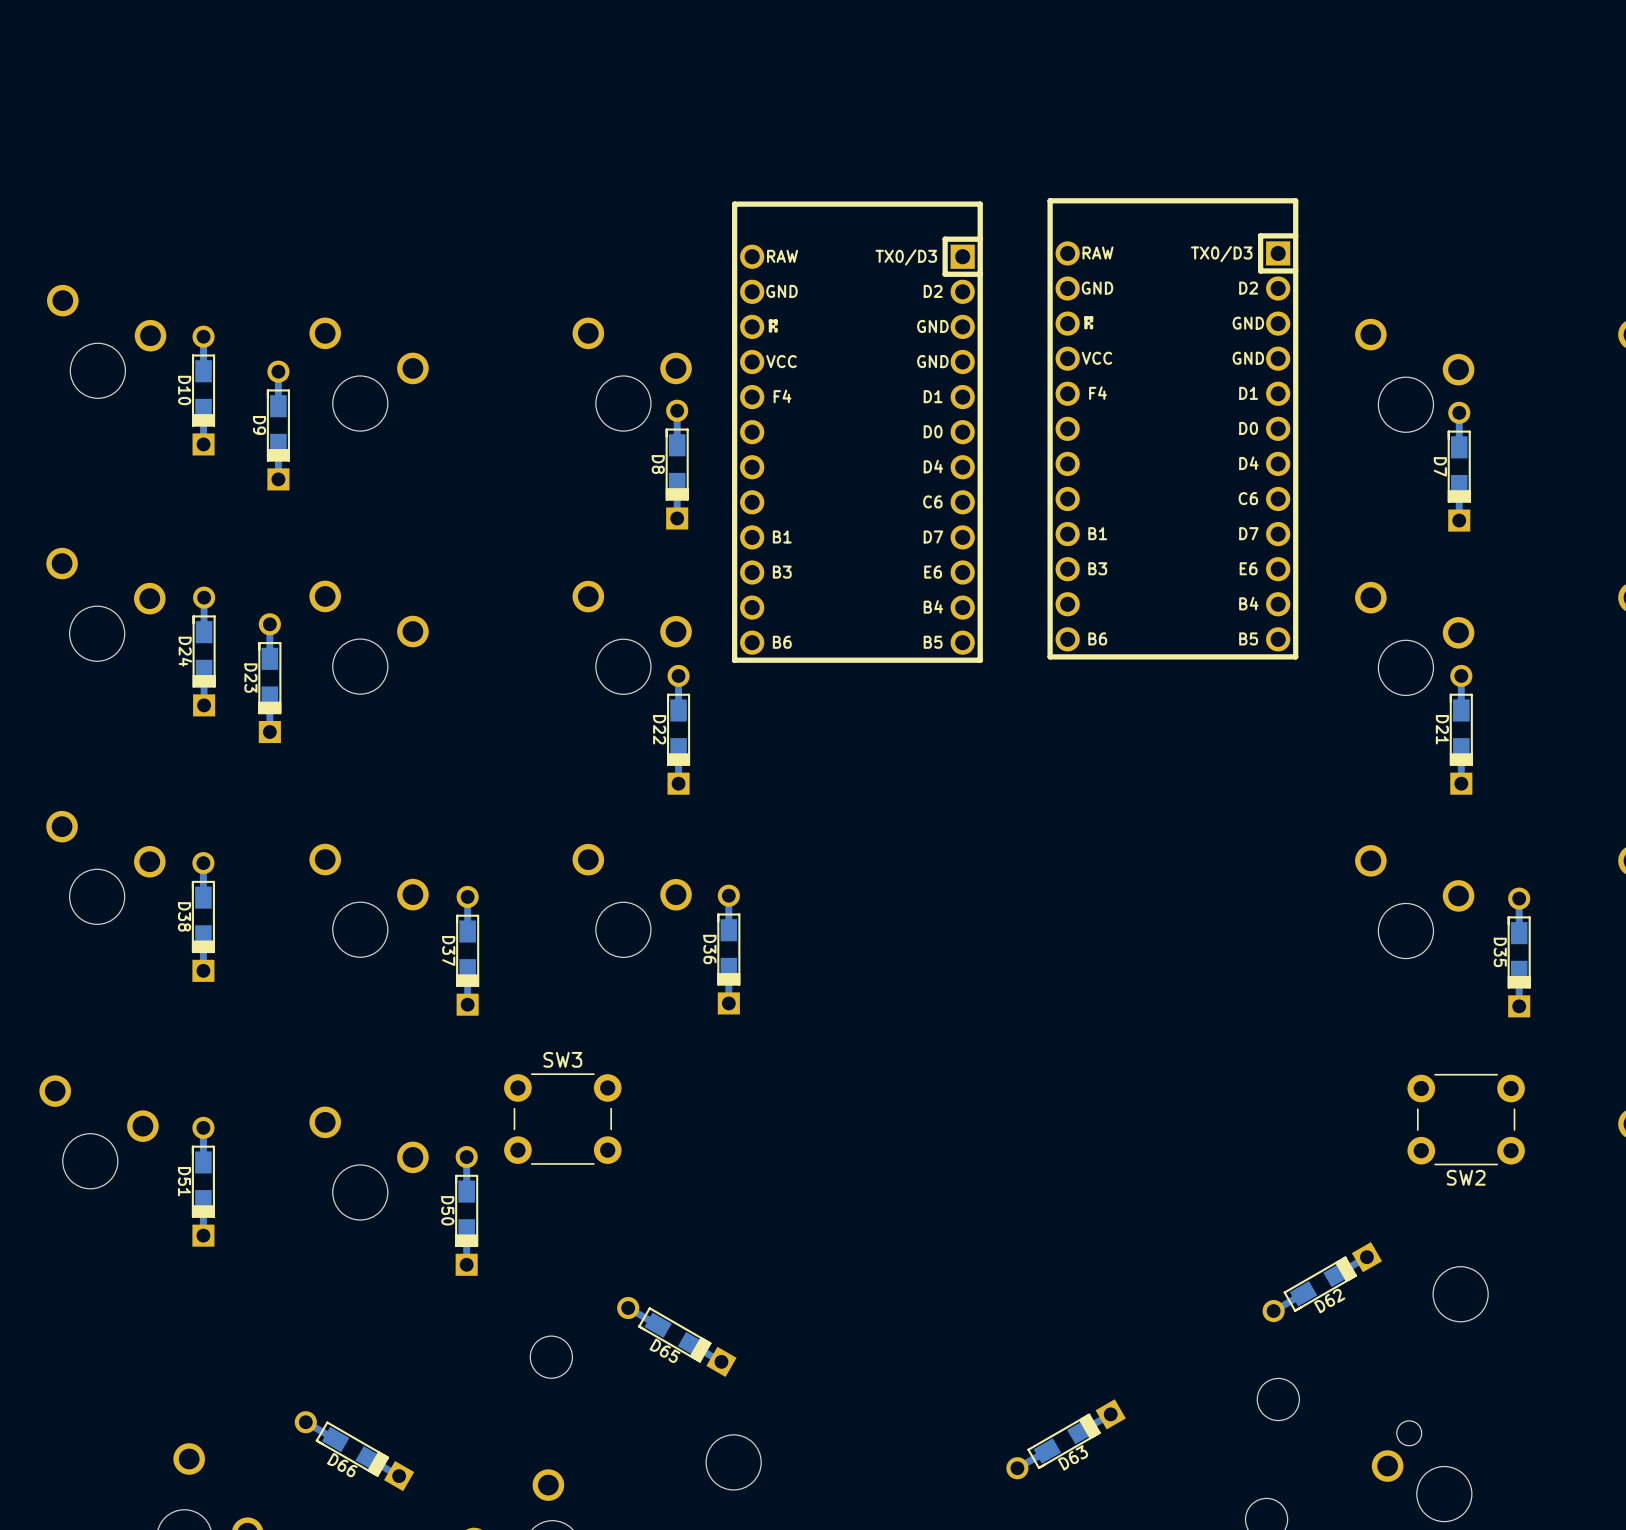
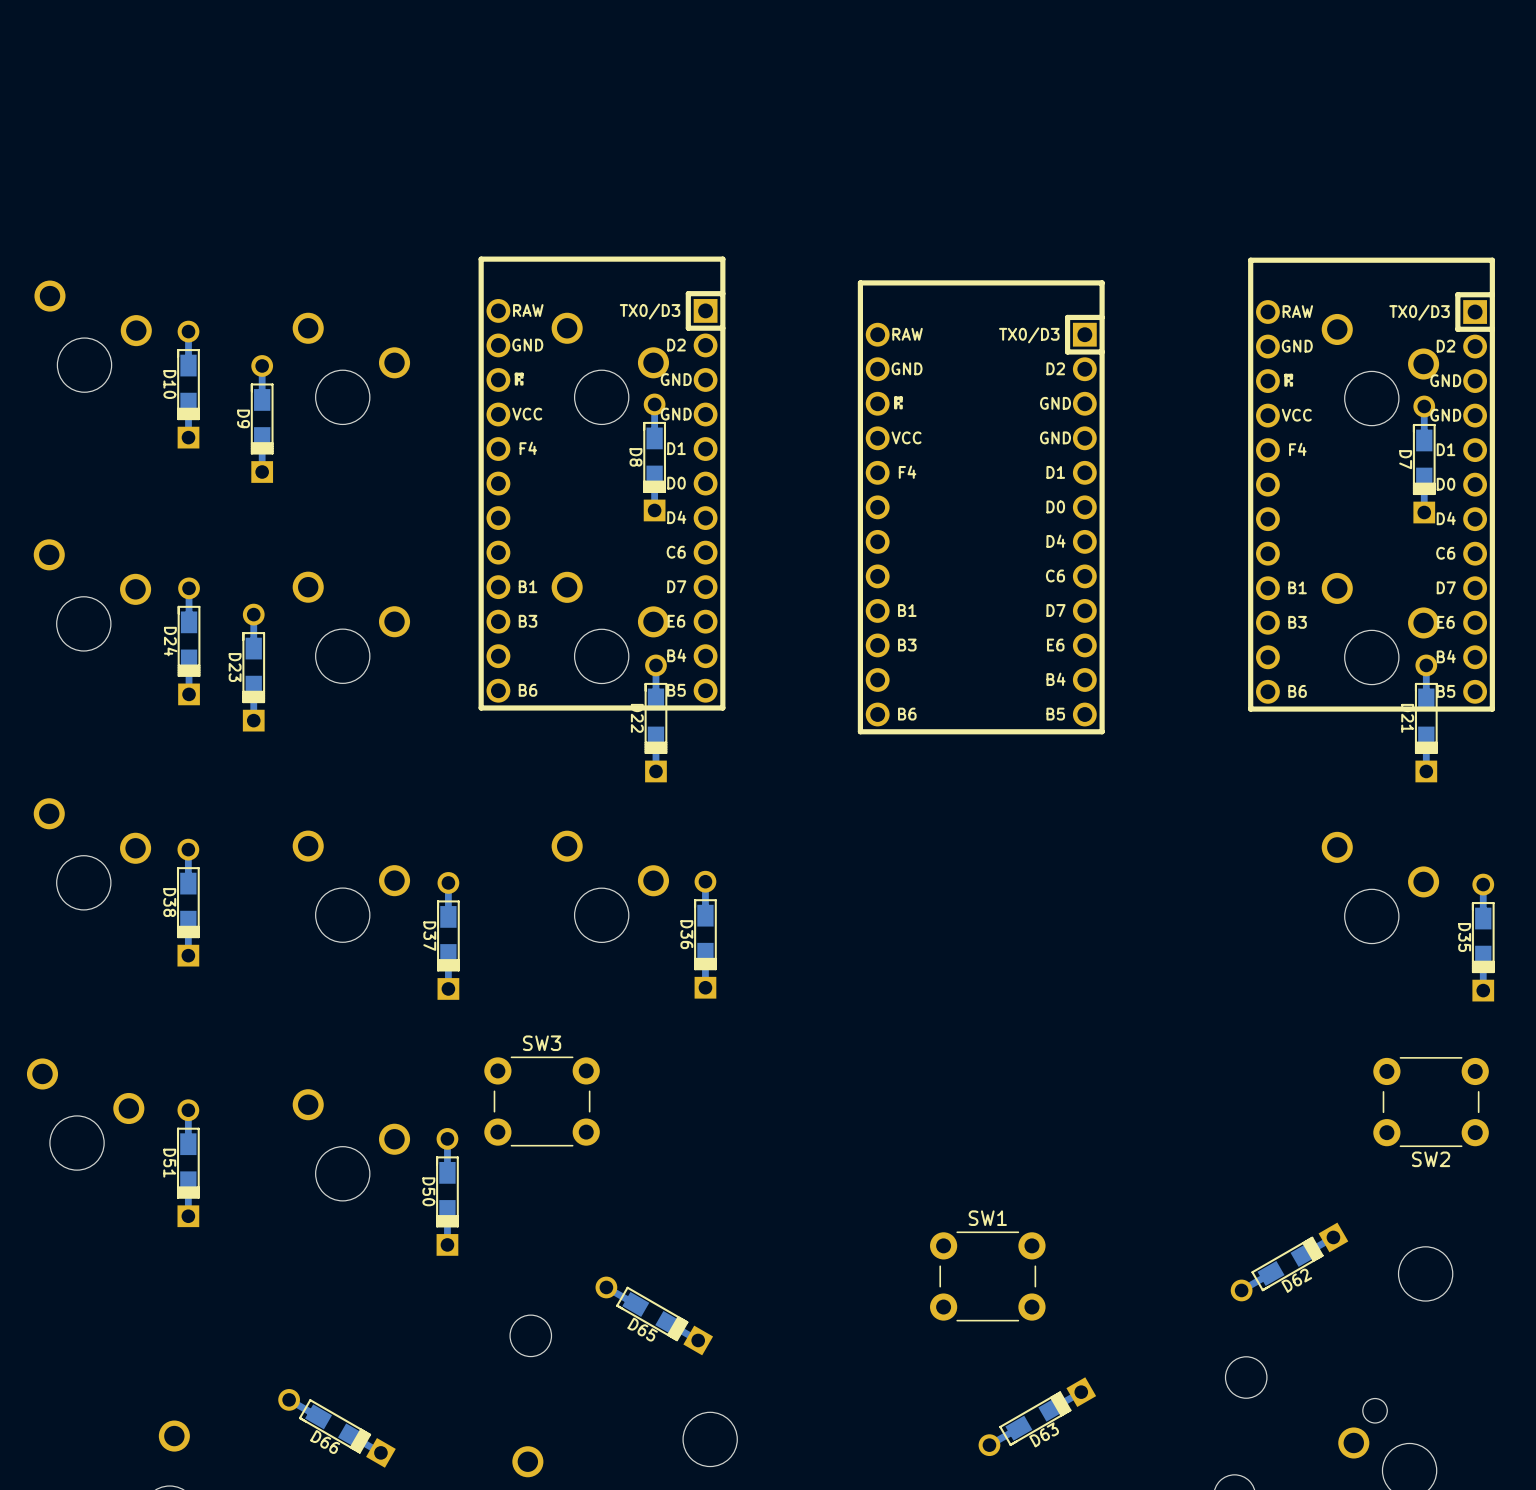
part: (1172, 428) -> none
part: (857, 432) -> none
part: none -> (602, 483)
part: none -> (1371, 484)
part: none -> (981, 507)
SW1: none -> (987, 1276)

